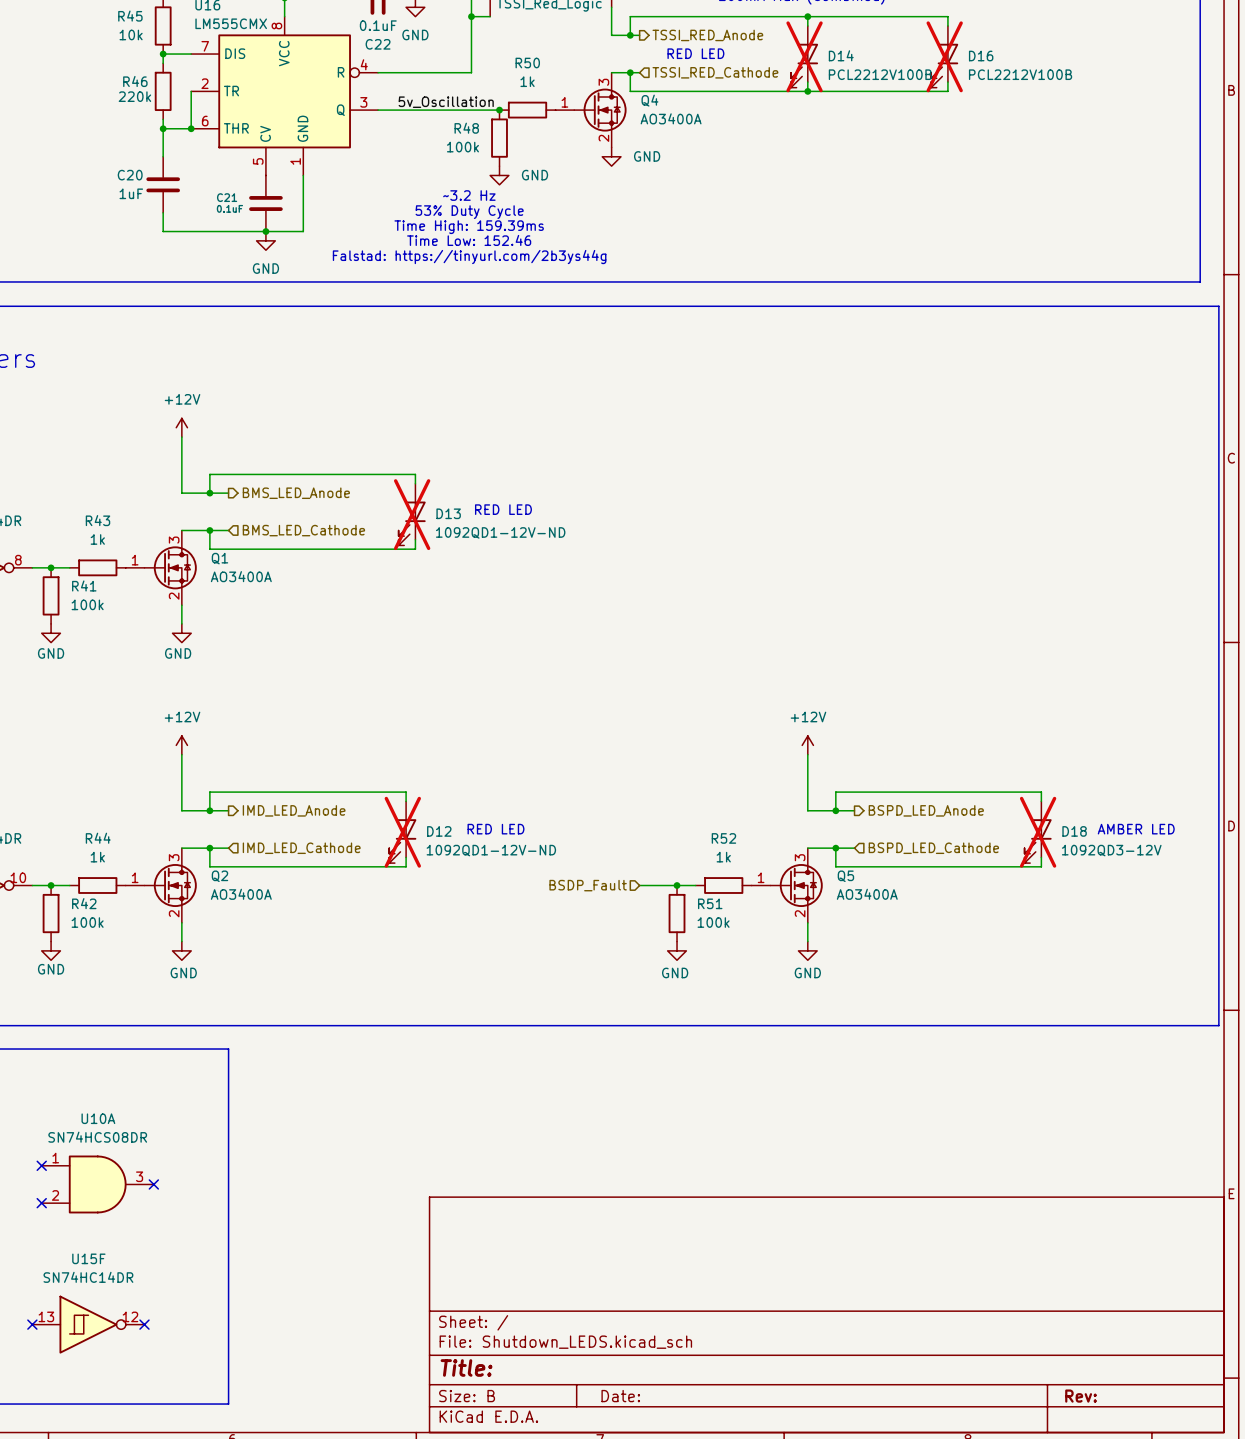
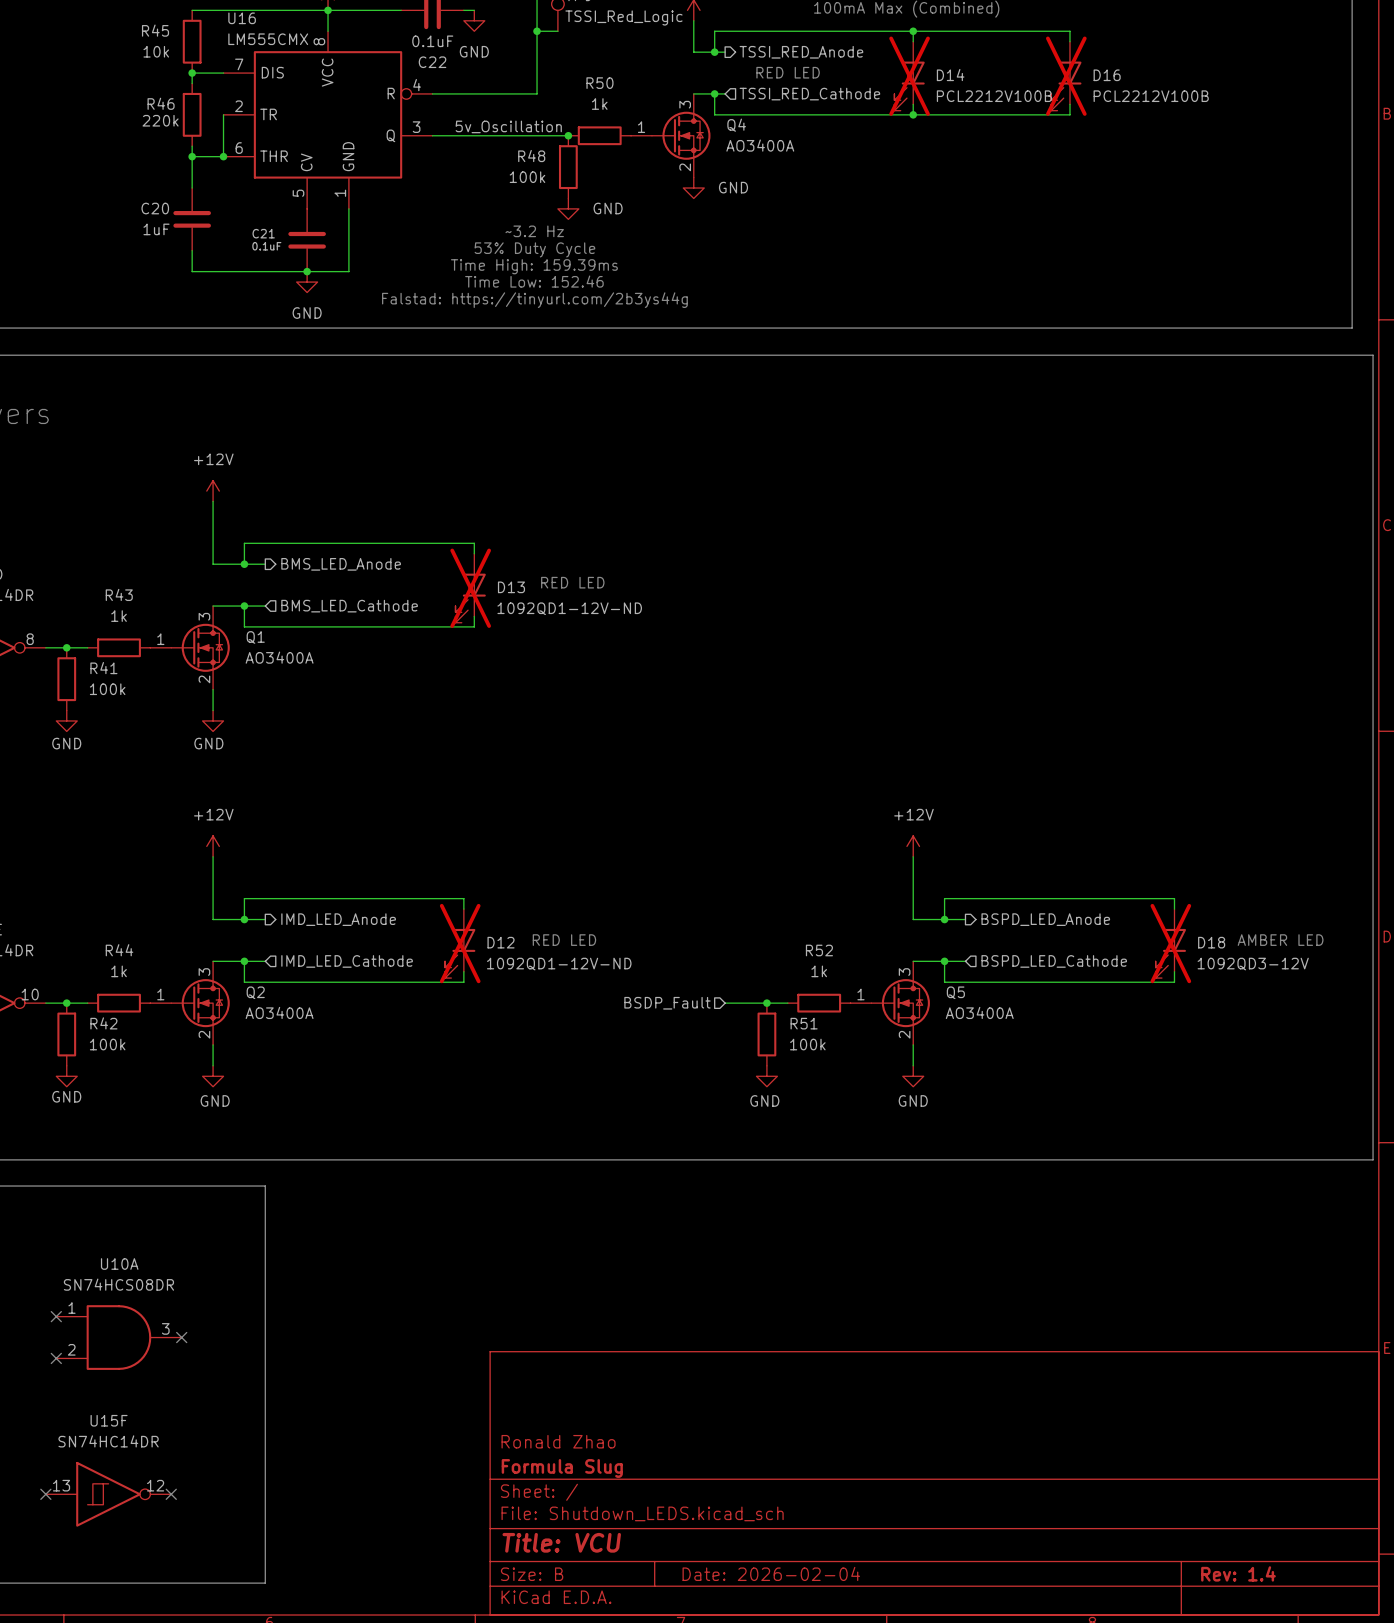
title block: none -> Ronald Zhao (558, 1441)
title block: none -> Formula Slug (562, 1468)
title block: Title: (466, 1367) -> Title: VCU (561, 1542)
title block: Date: (620, 1396) -> Date: 2026-02-04 (771, 1573)
title block: Rev: (1080, 1396) -> Rev: 1.4 (1238, 1573)

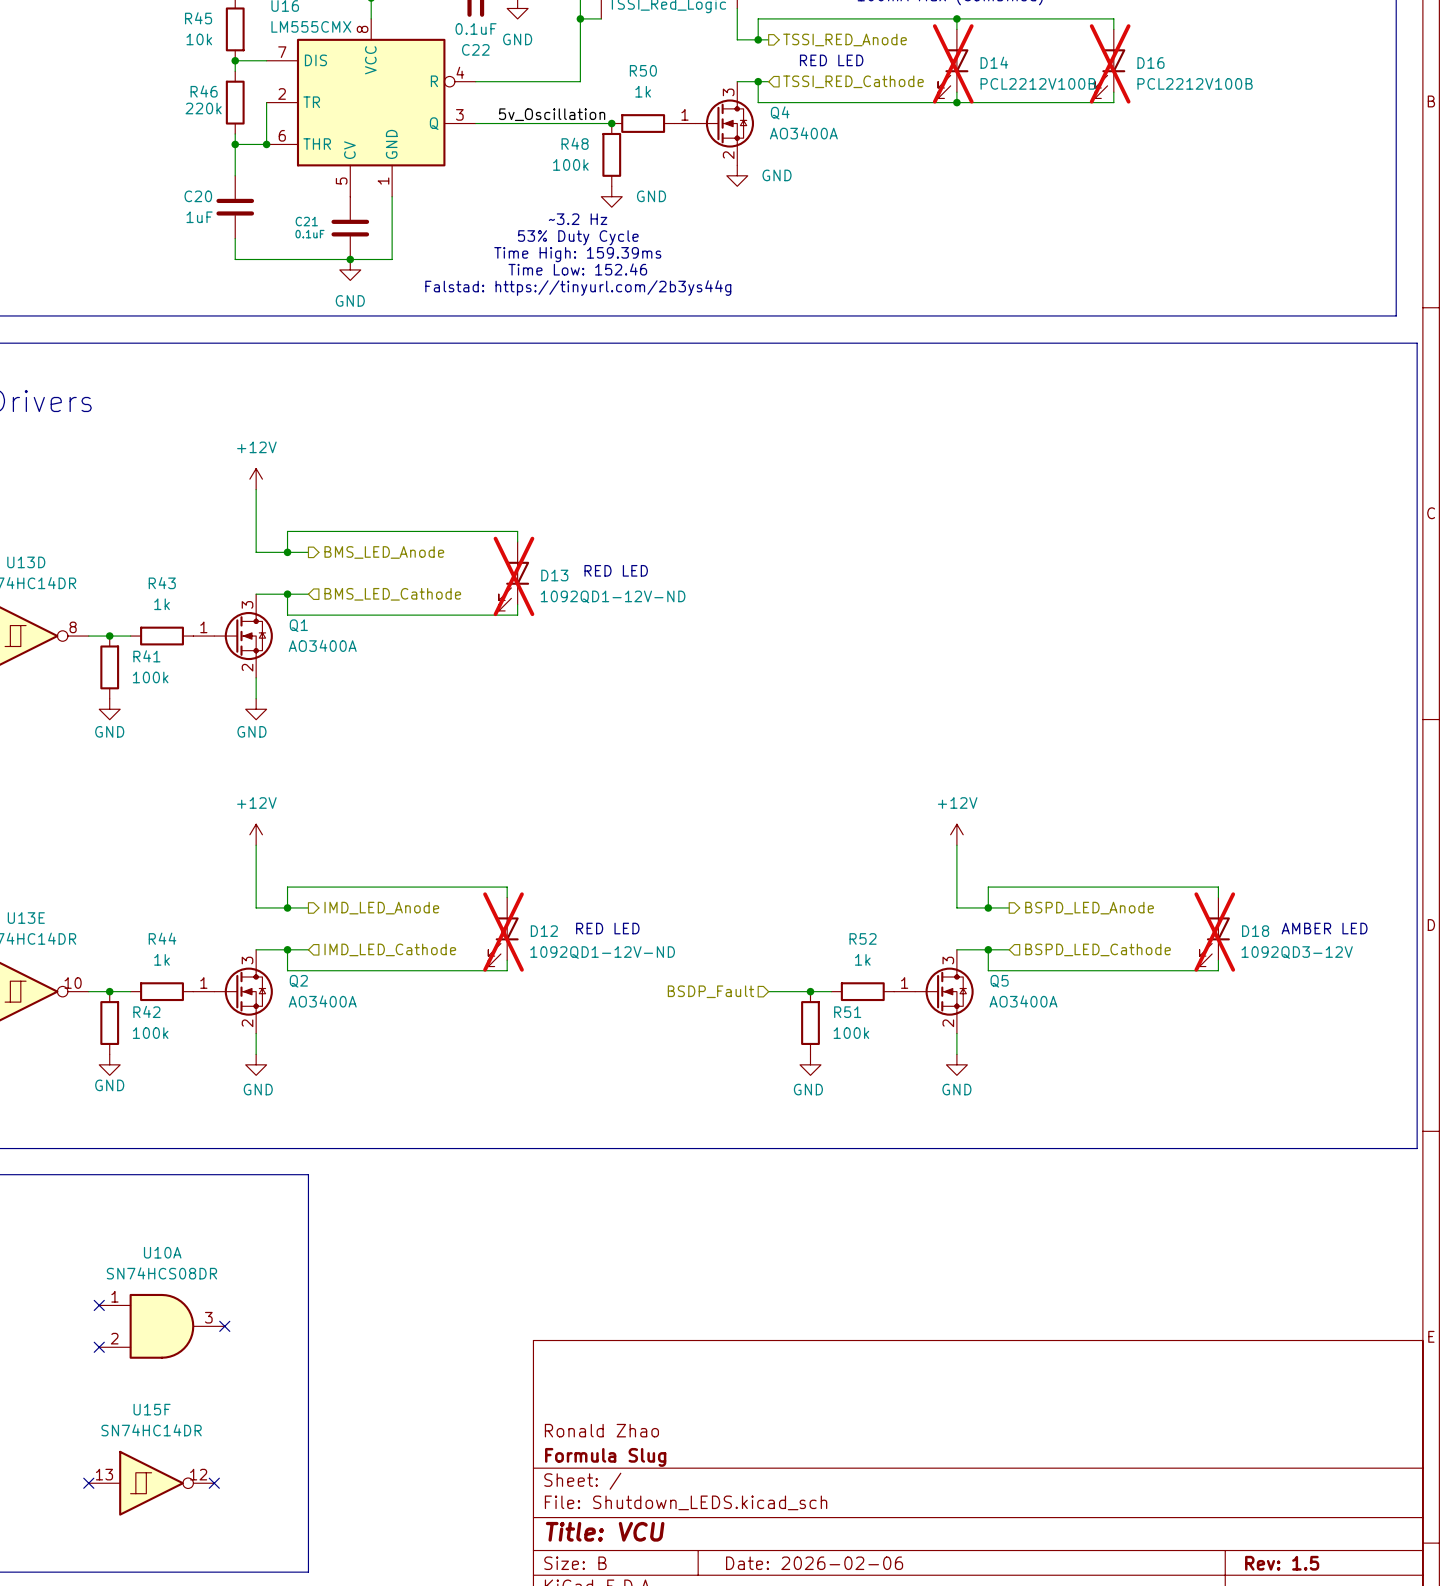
title block: Date: 2026-02-04 (771, 1573) -> Date: 2026-02-06 (814, 1563)
title block: Rev: 1.4 (1238, 1573) -> Rev: 1.5 (1282, 1563)

